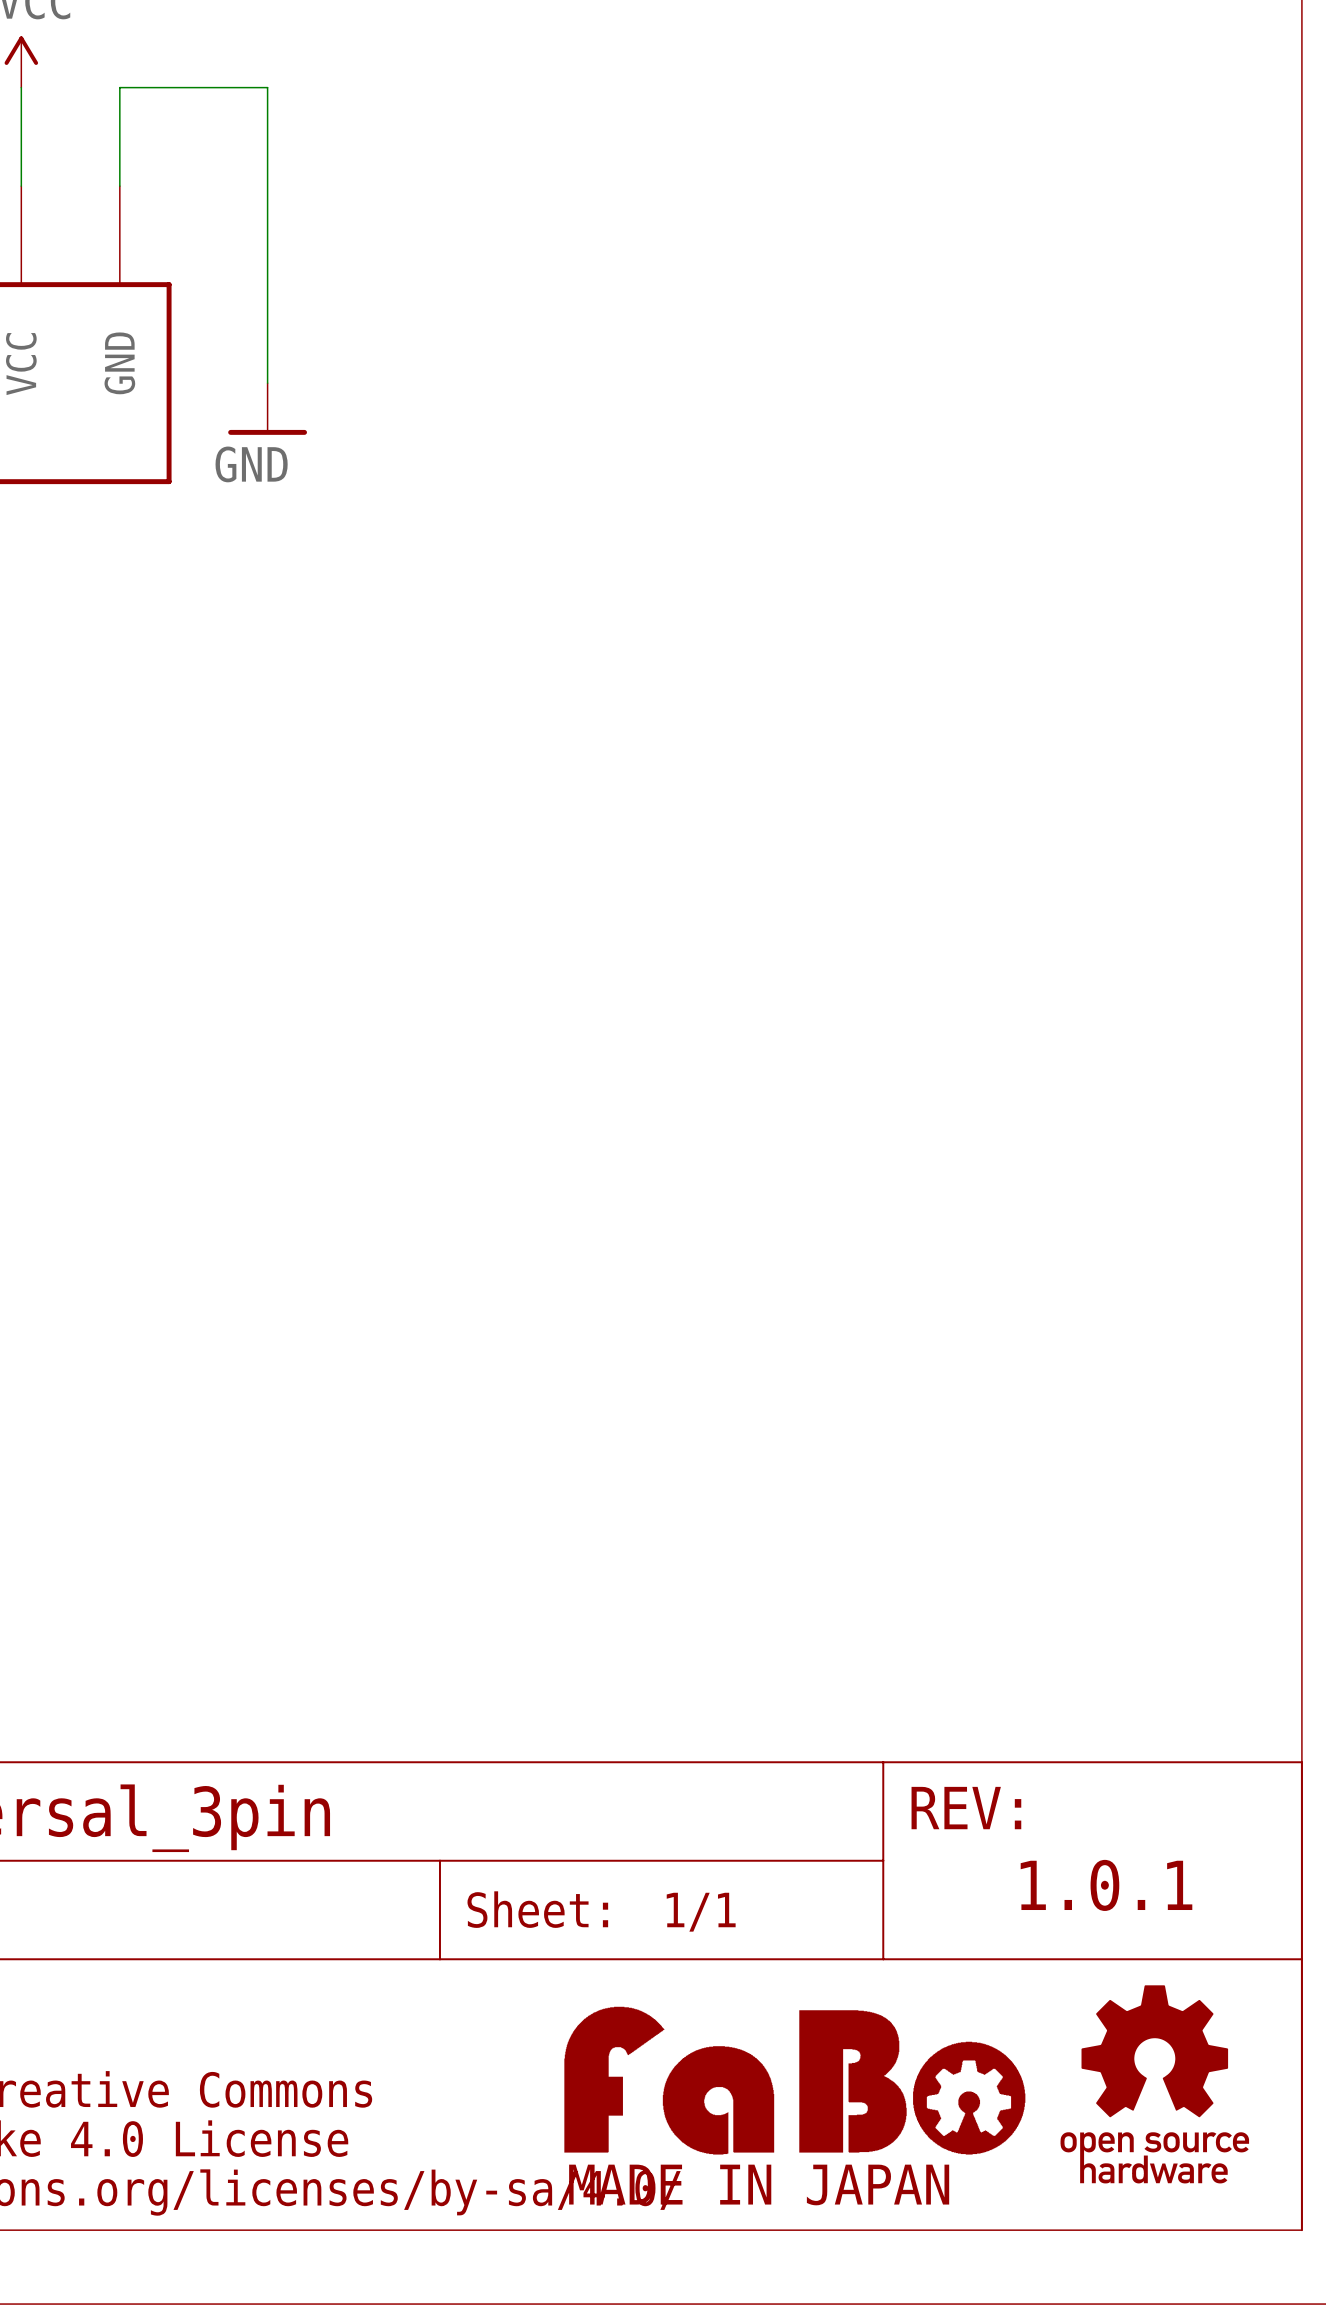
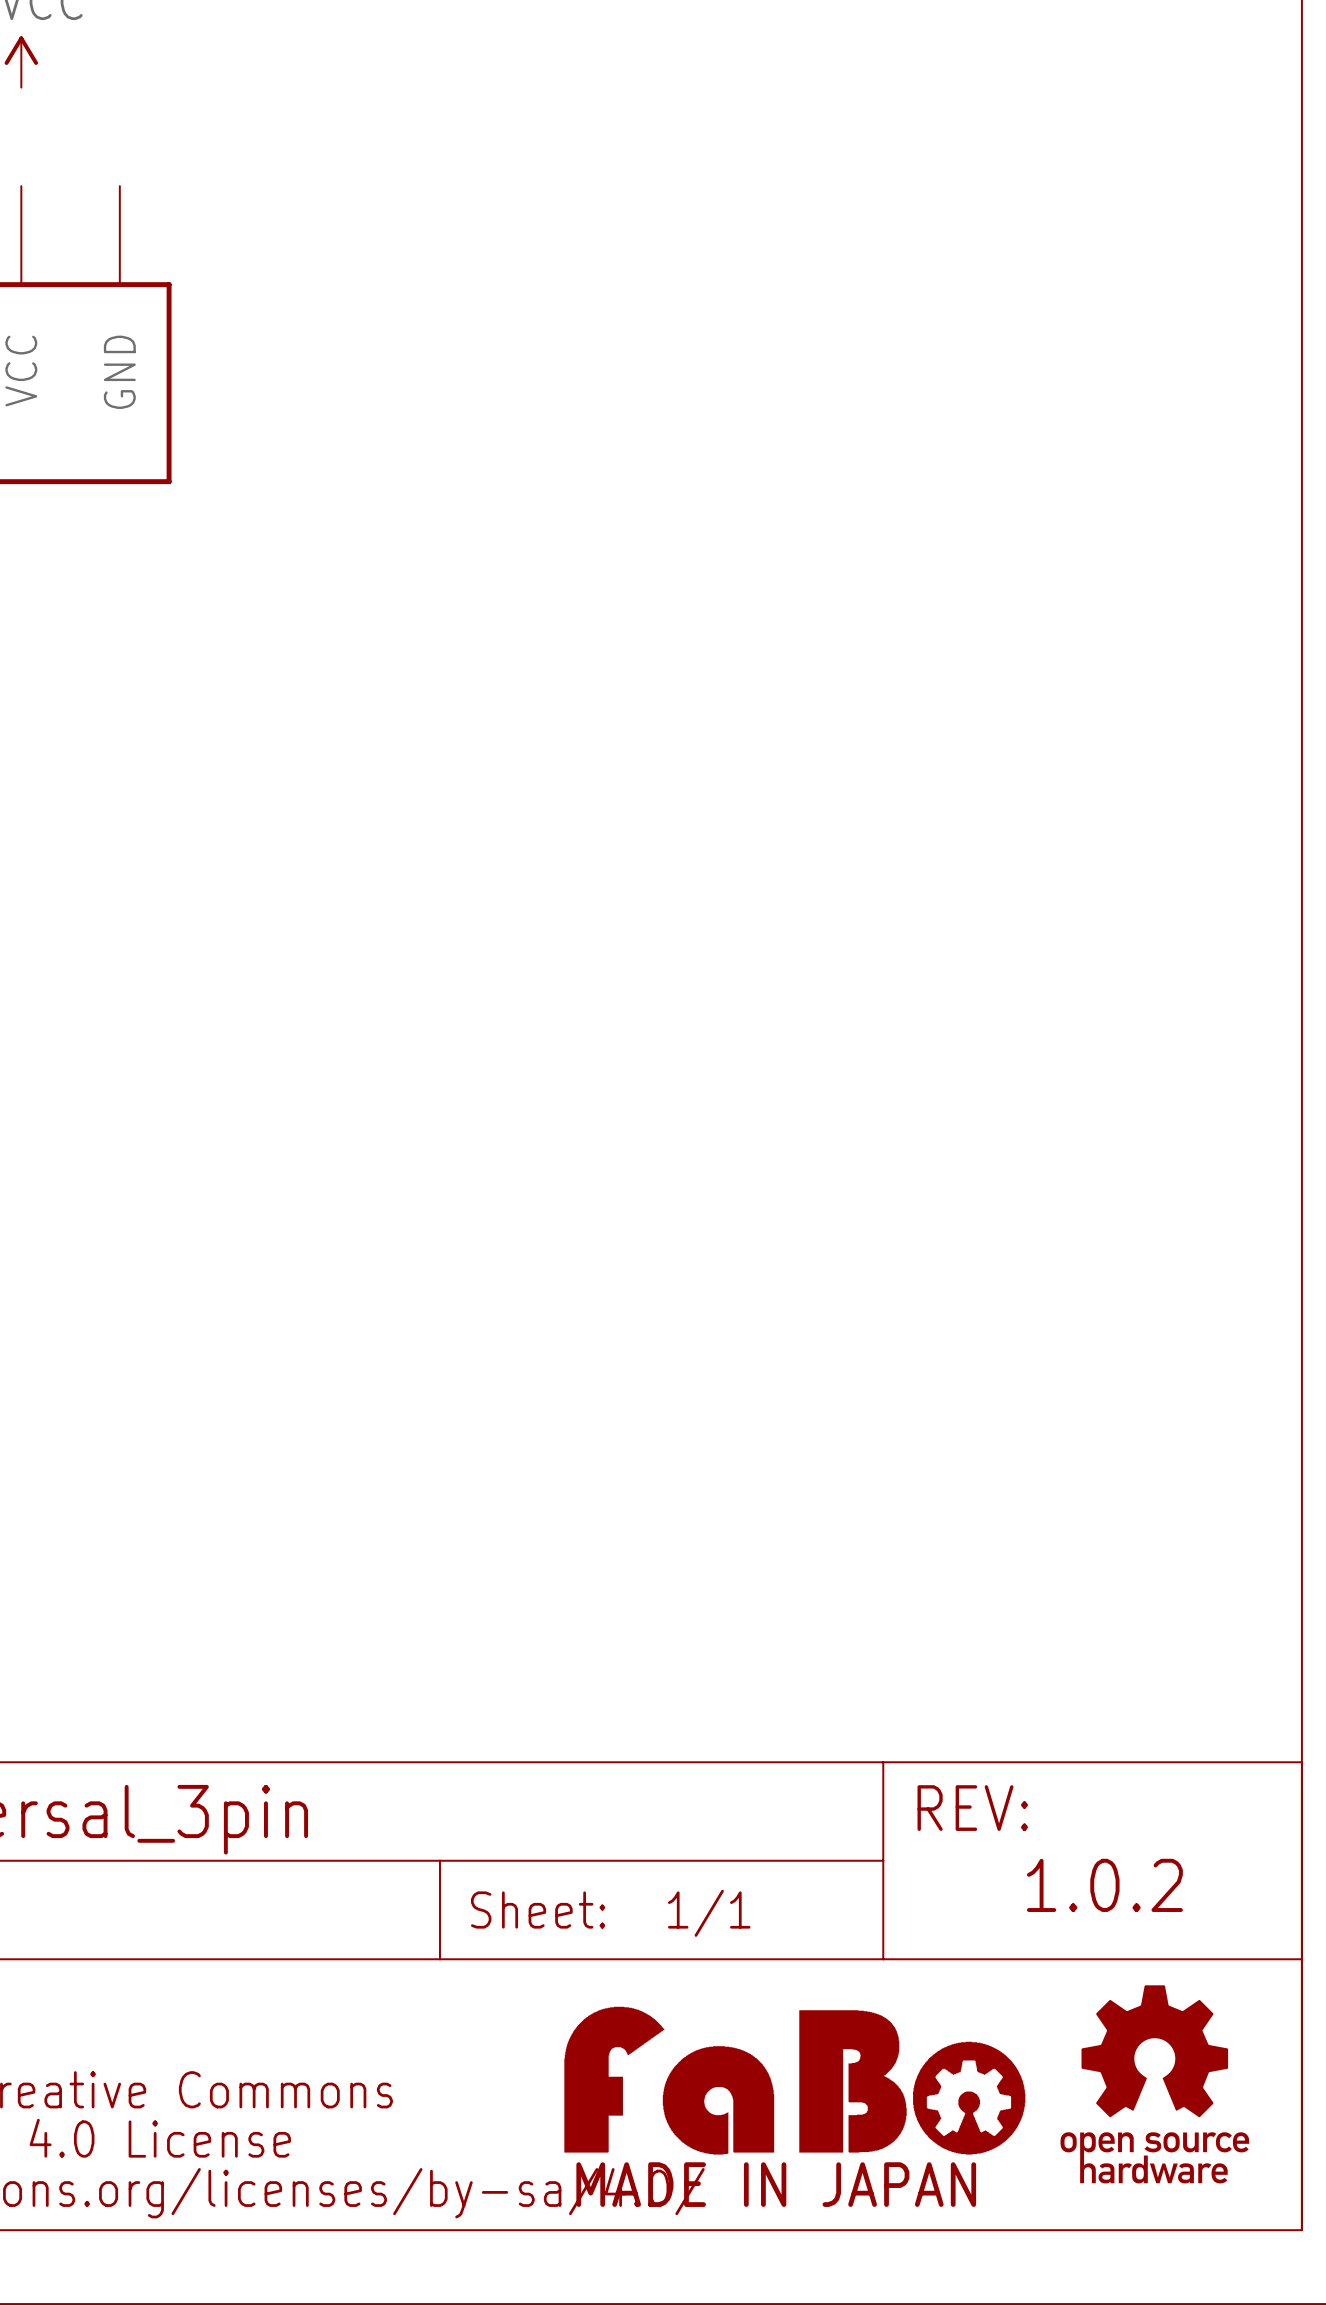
wire: (21, 87) (21, 186) -> none
wire: (119, 186) (119, 87) (267, 87) (267, 383) -> none
power symbol: GND (267, 408) -> none
text: 1.0.1 (1106, 1885) -> 1.0.2 (1104, 1885)

